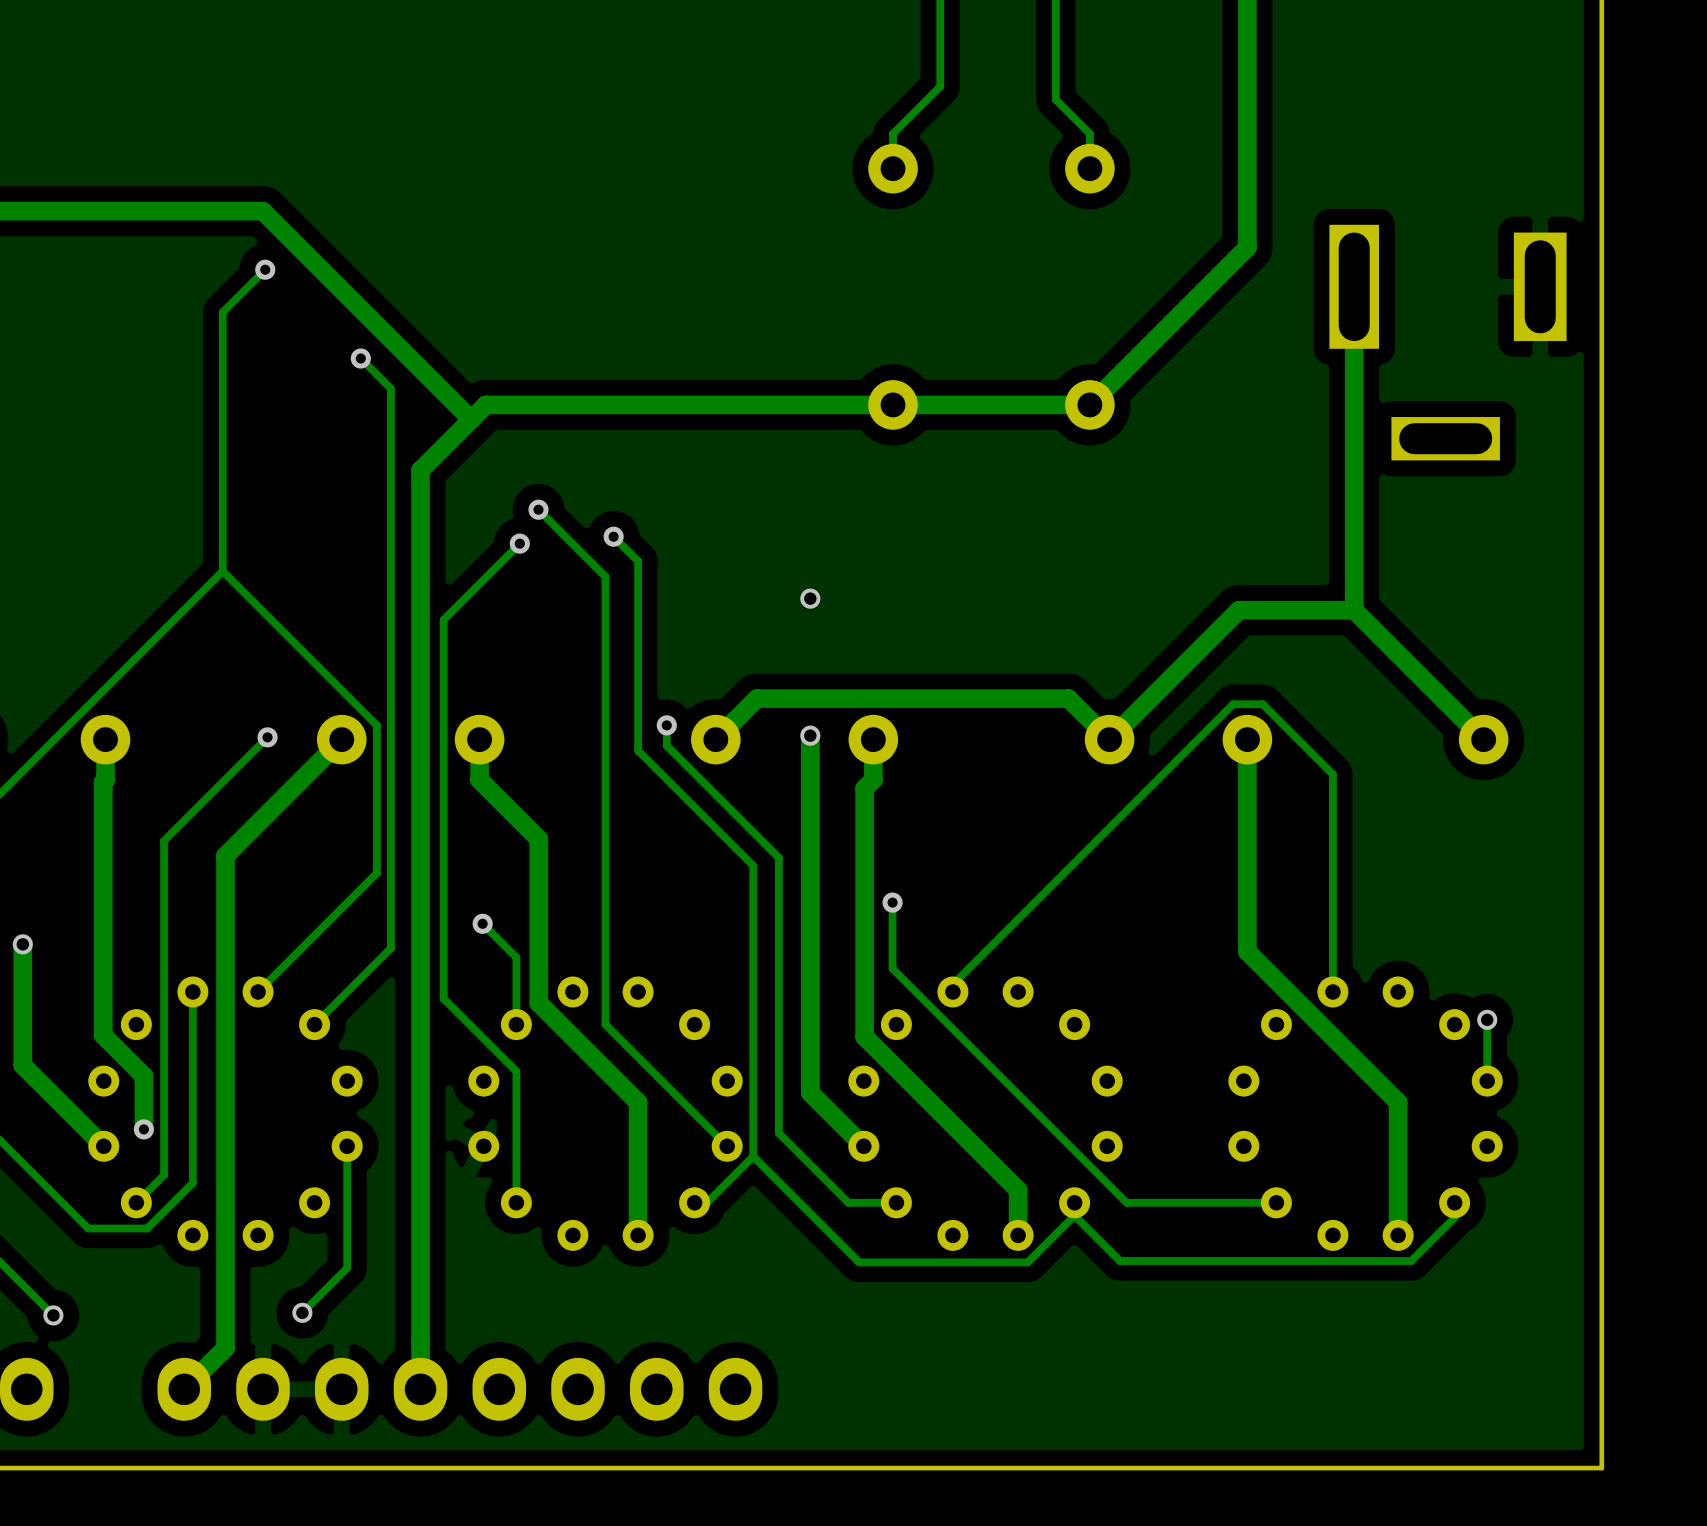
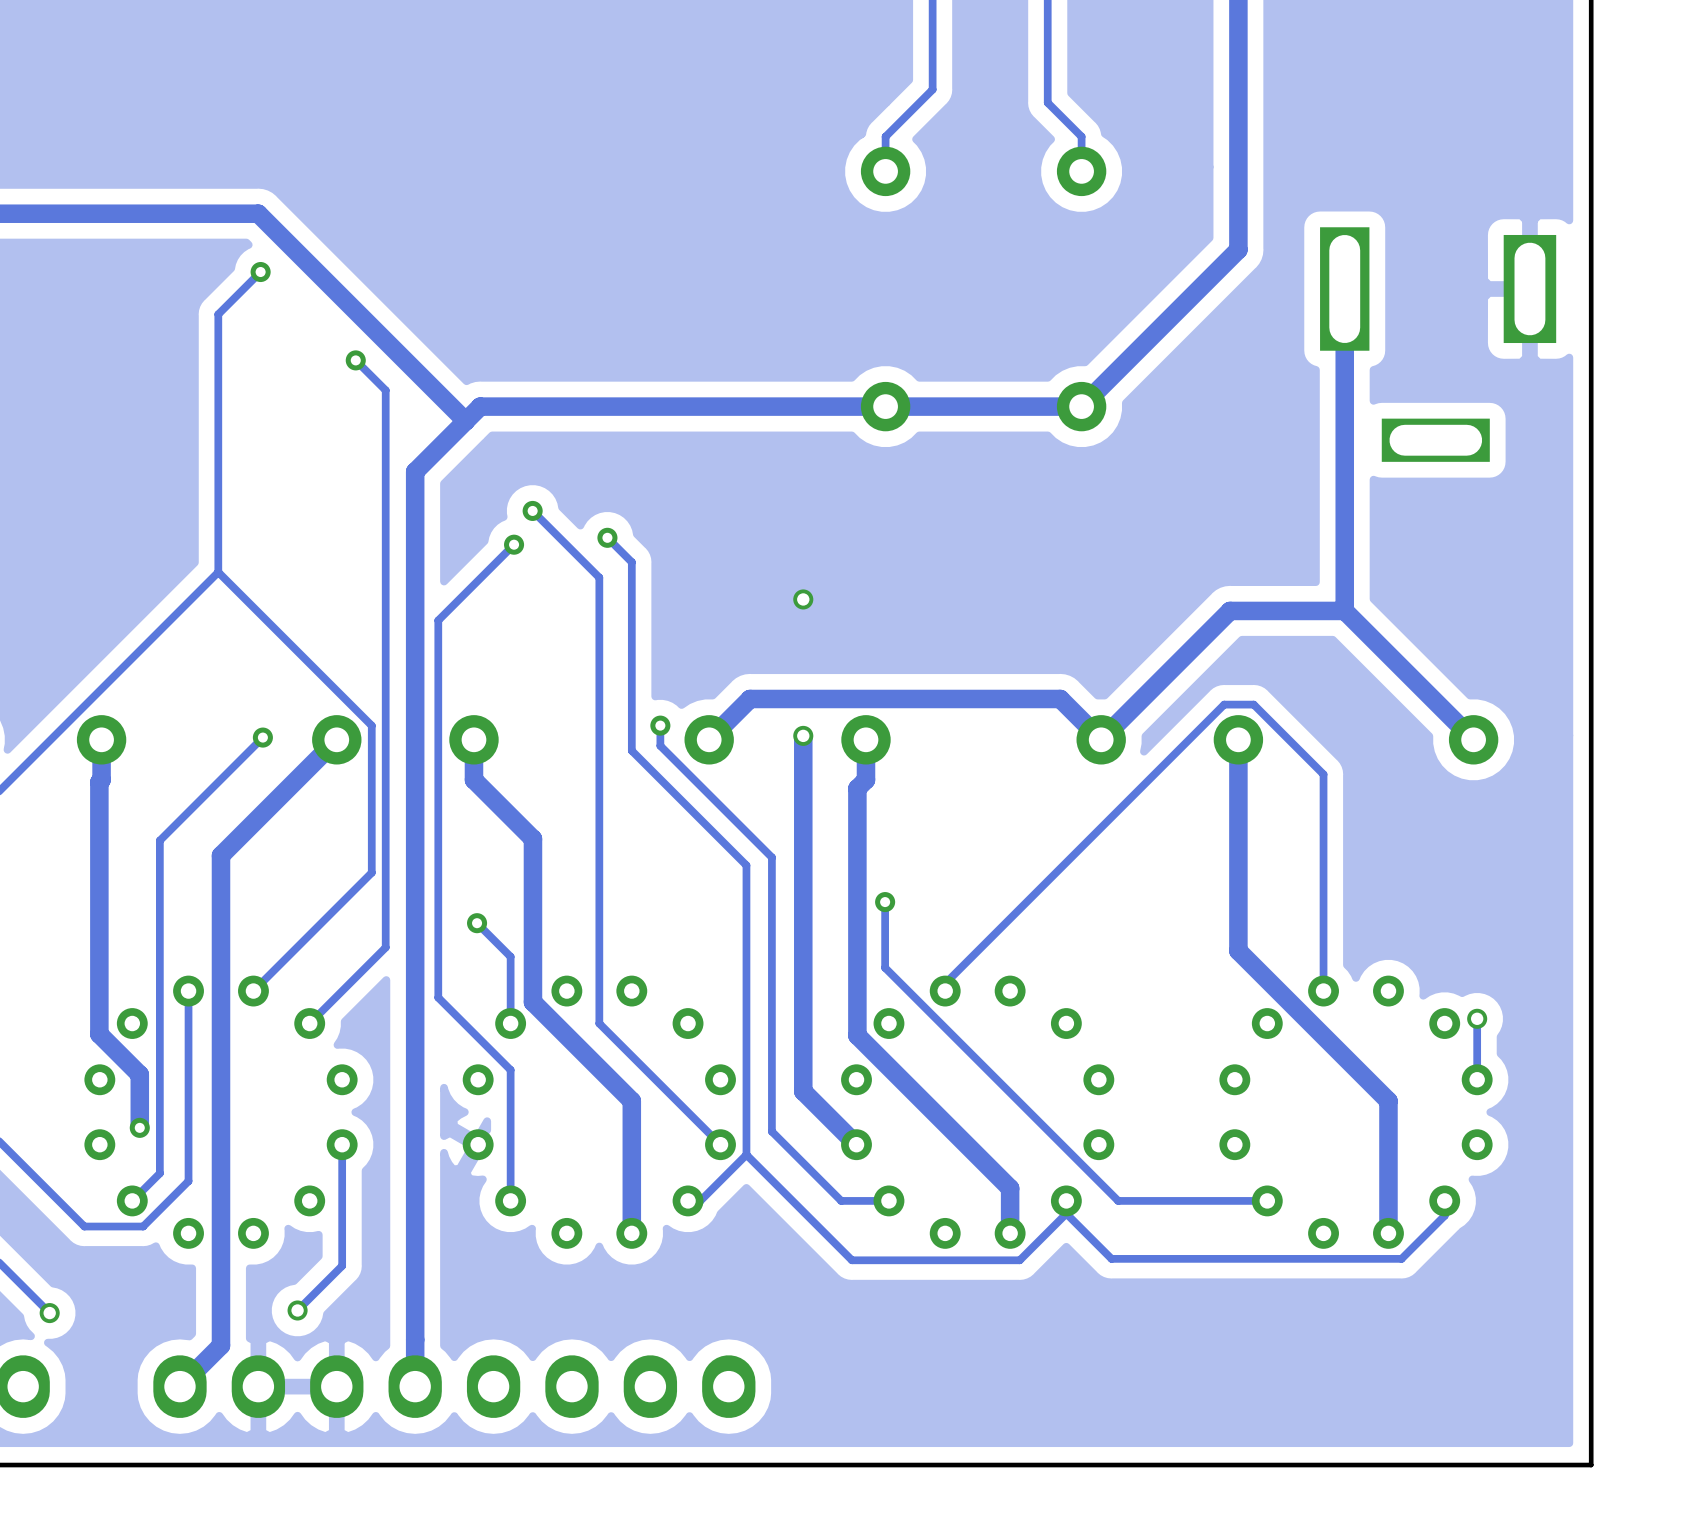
track: (22, 944) (22, 1065) (103, 1146) -> none
via: (22, 944) -> none

